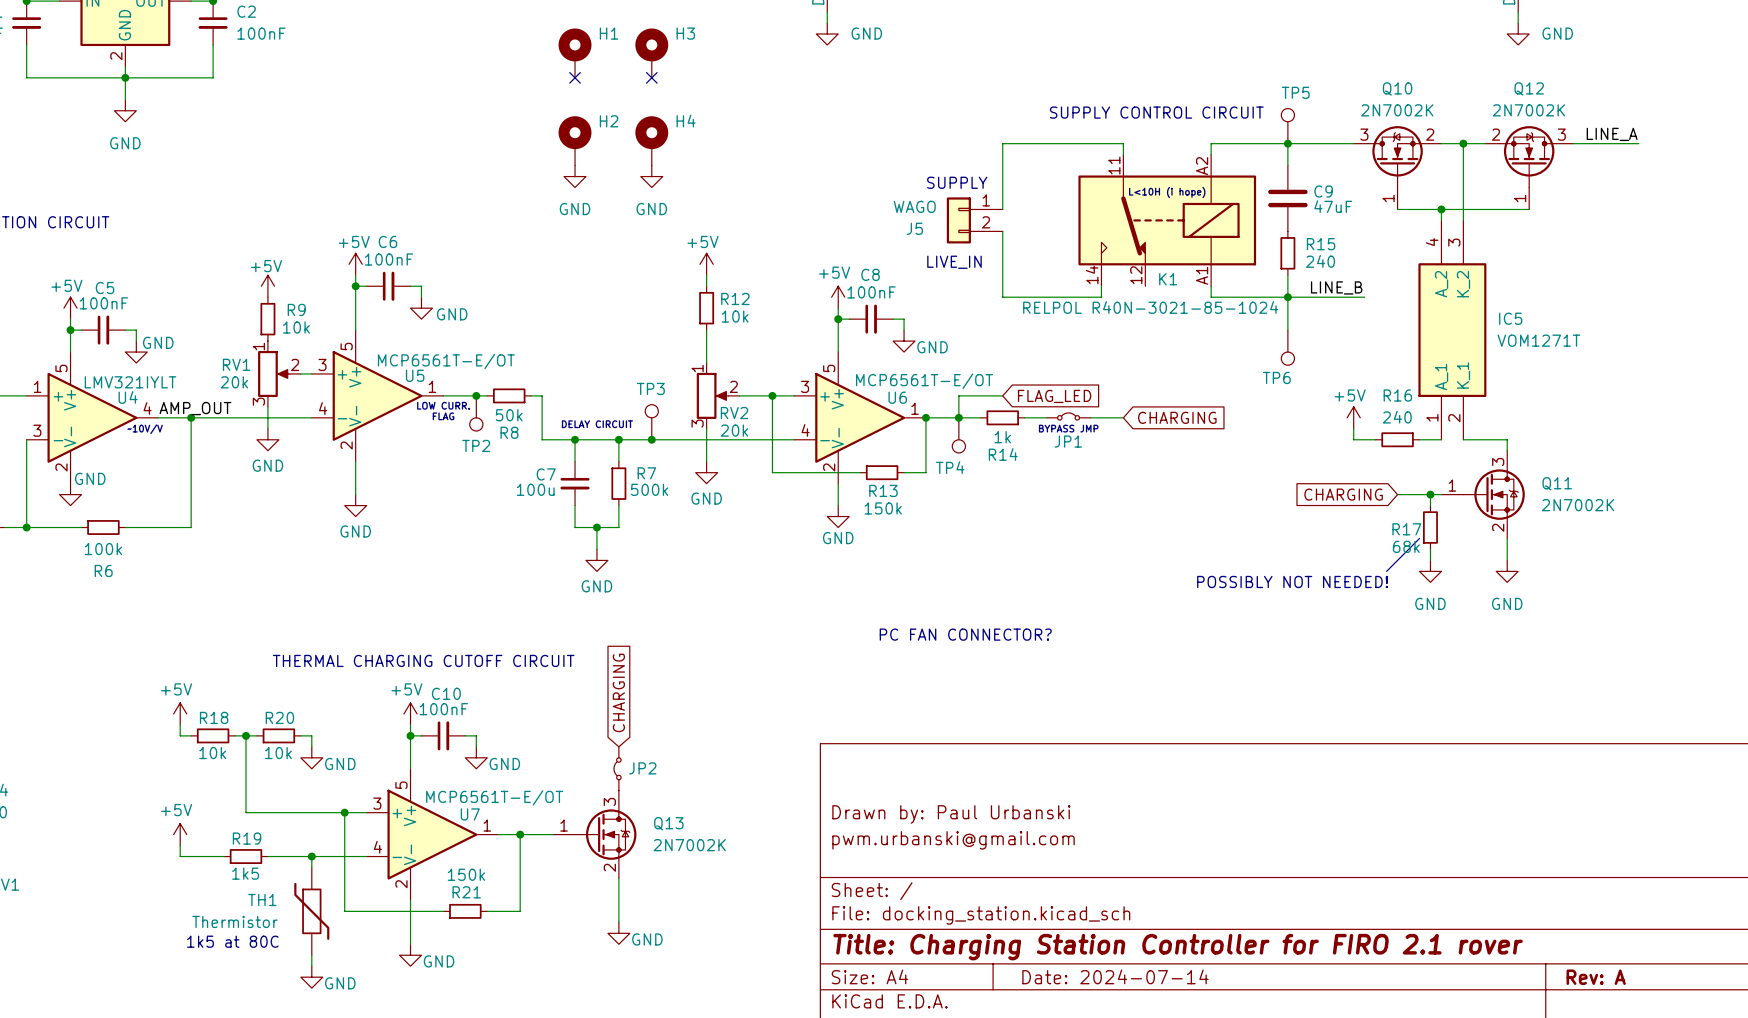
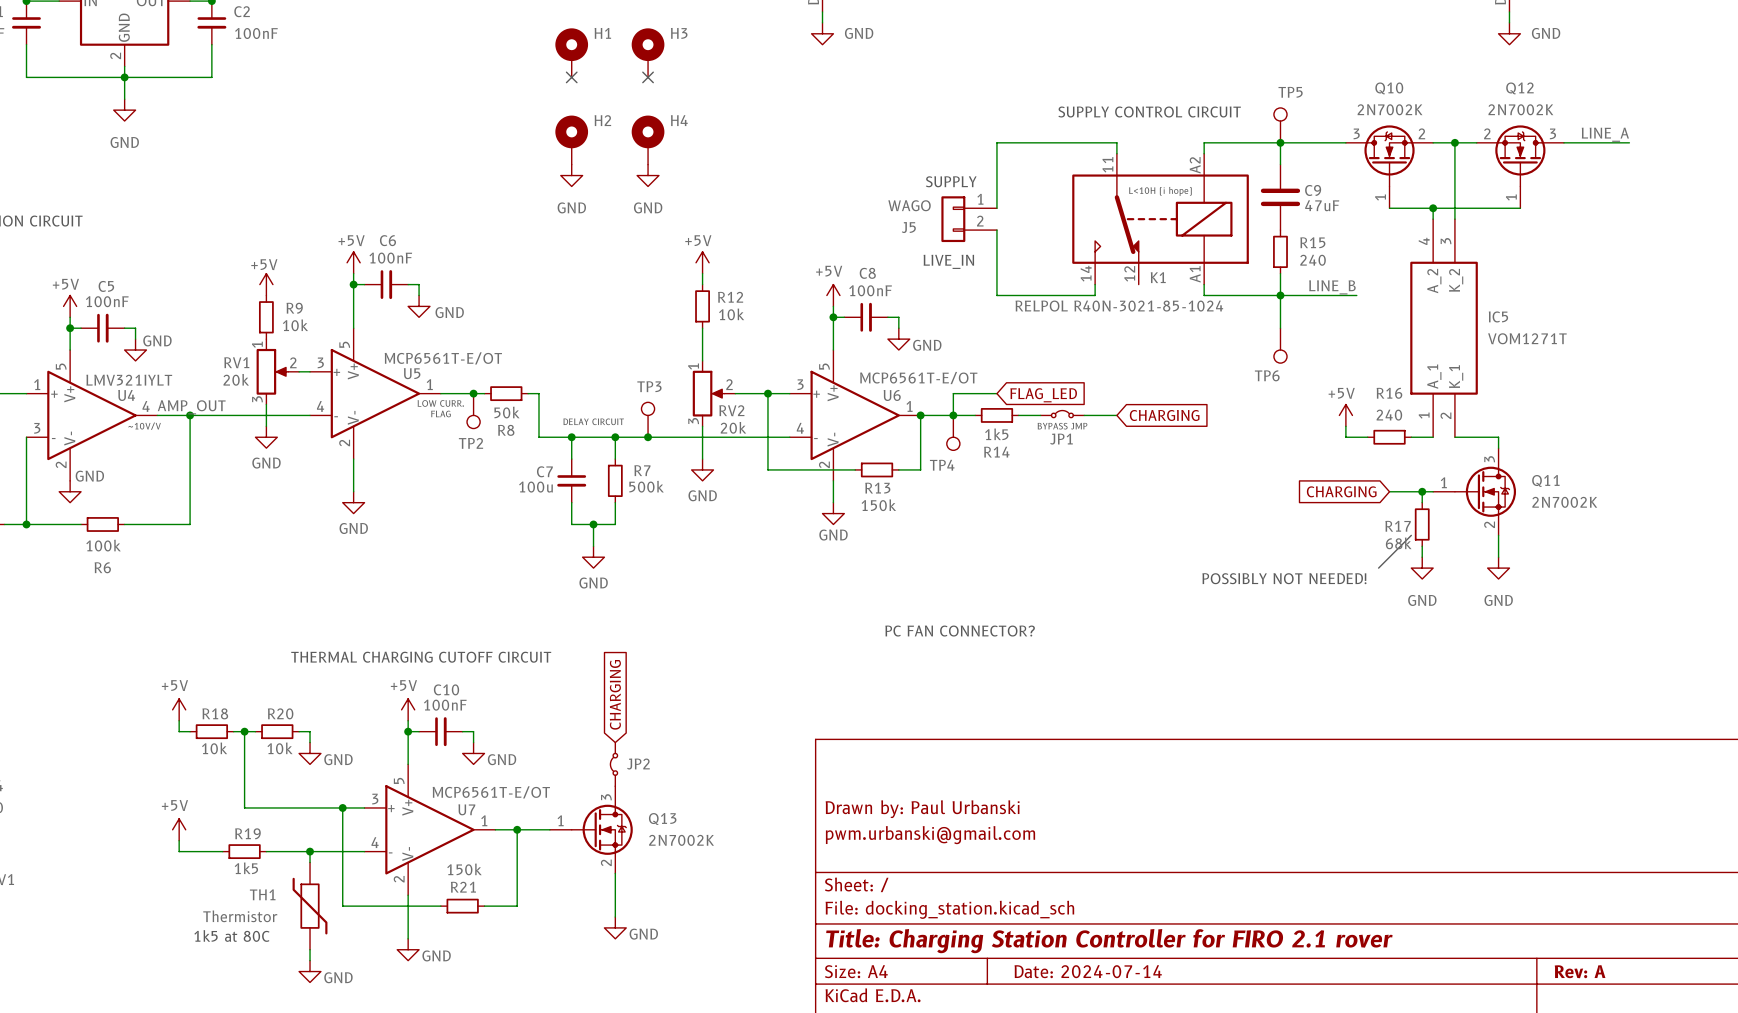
R14 value: 1k (1002, 437) -> 1k5 (996, 434)

